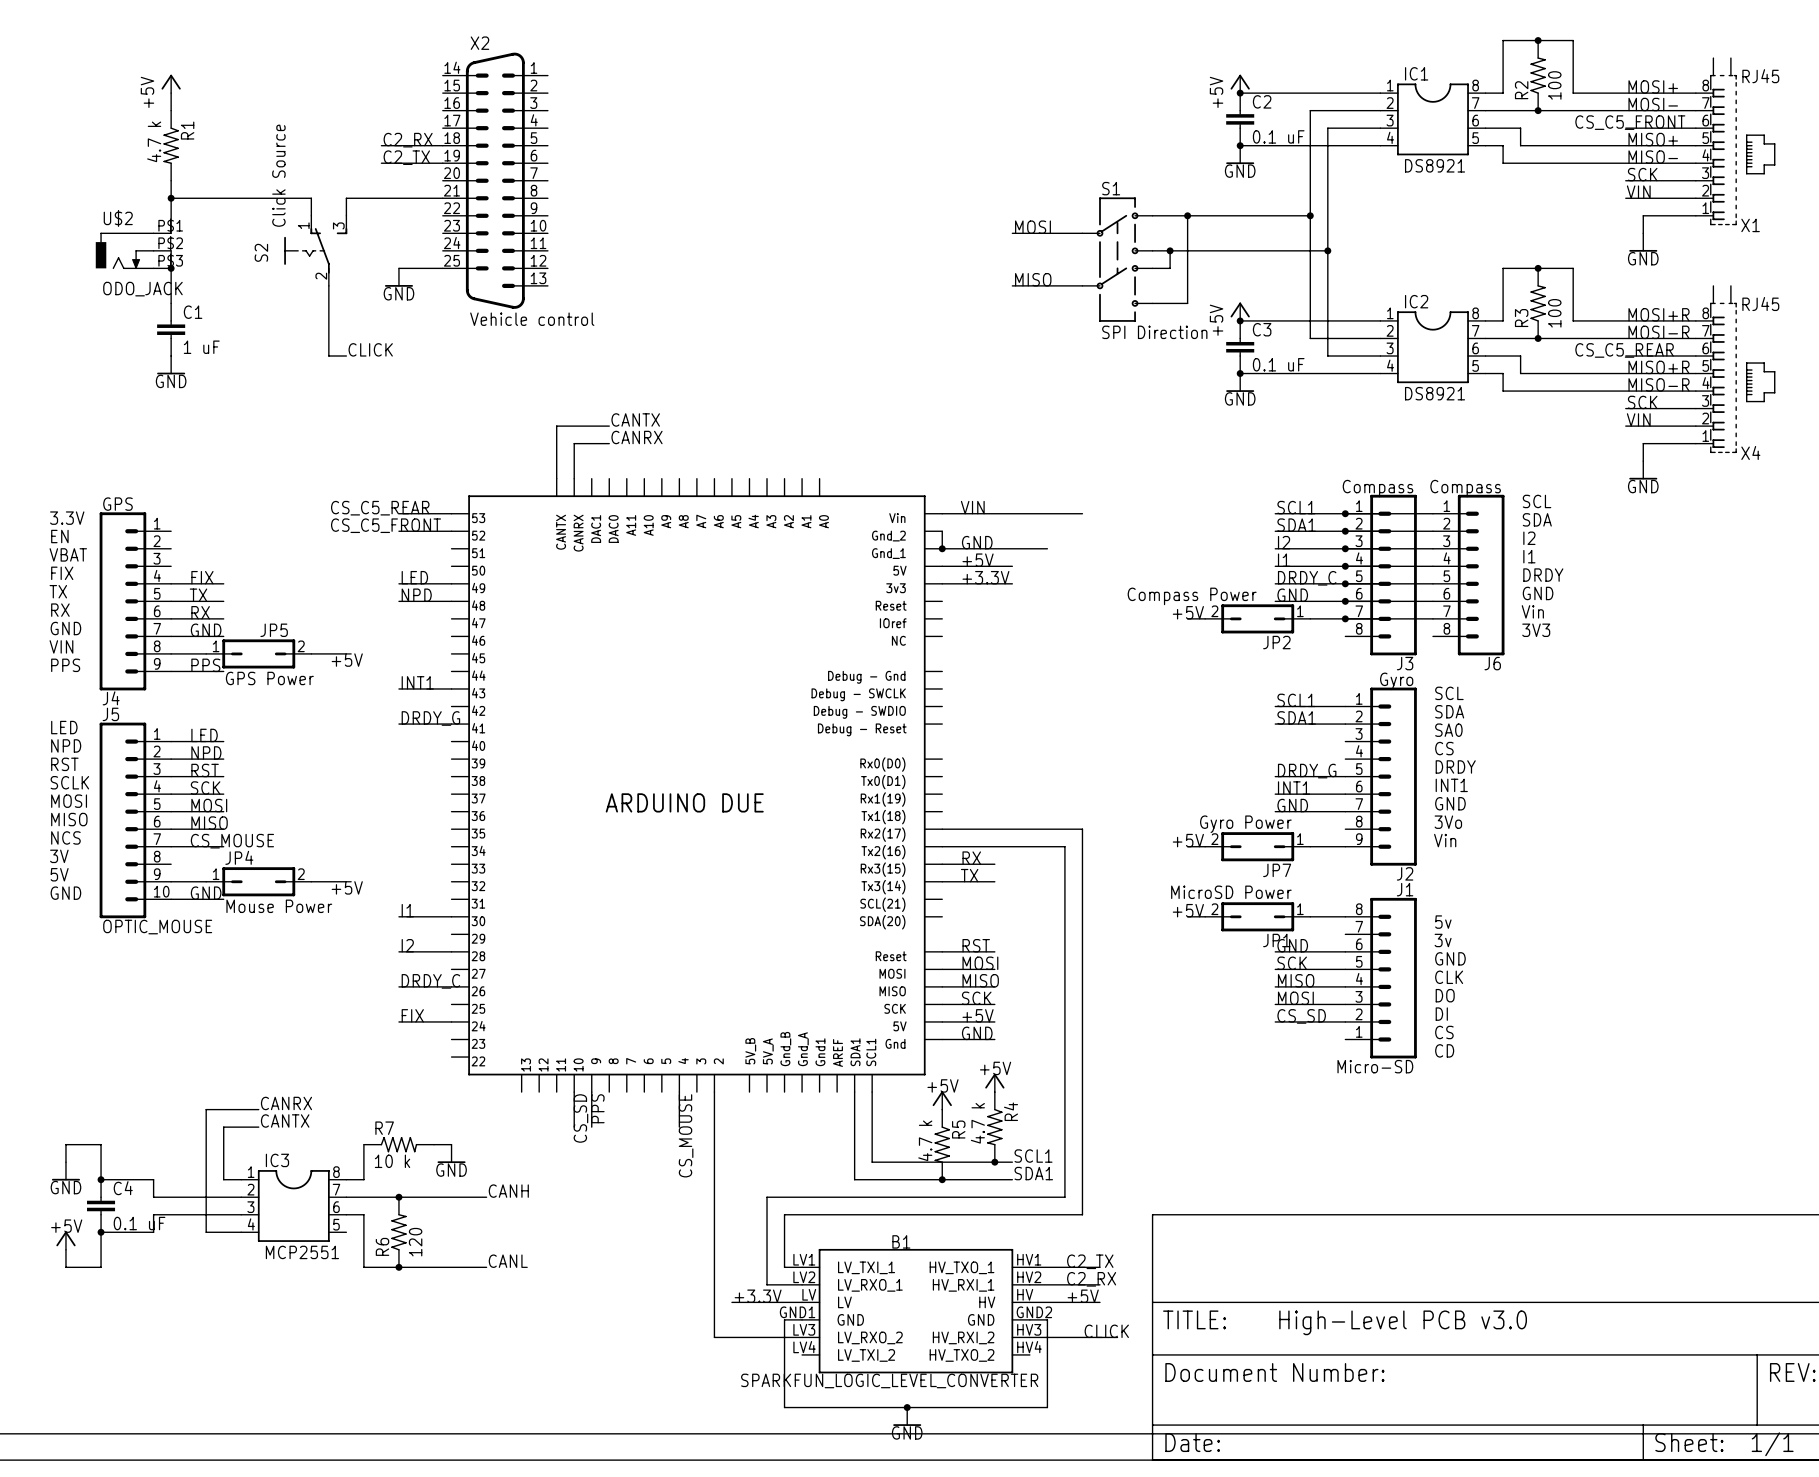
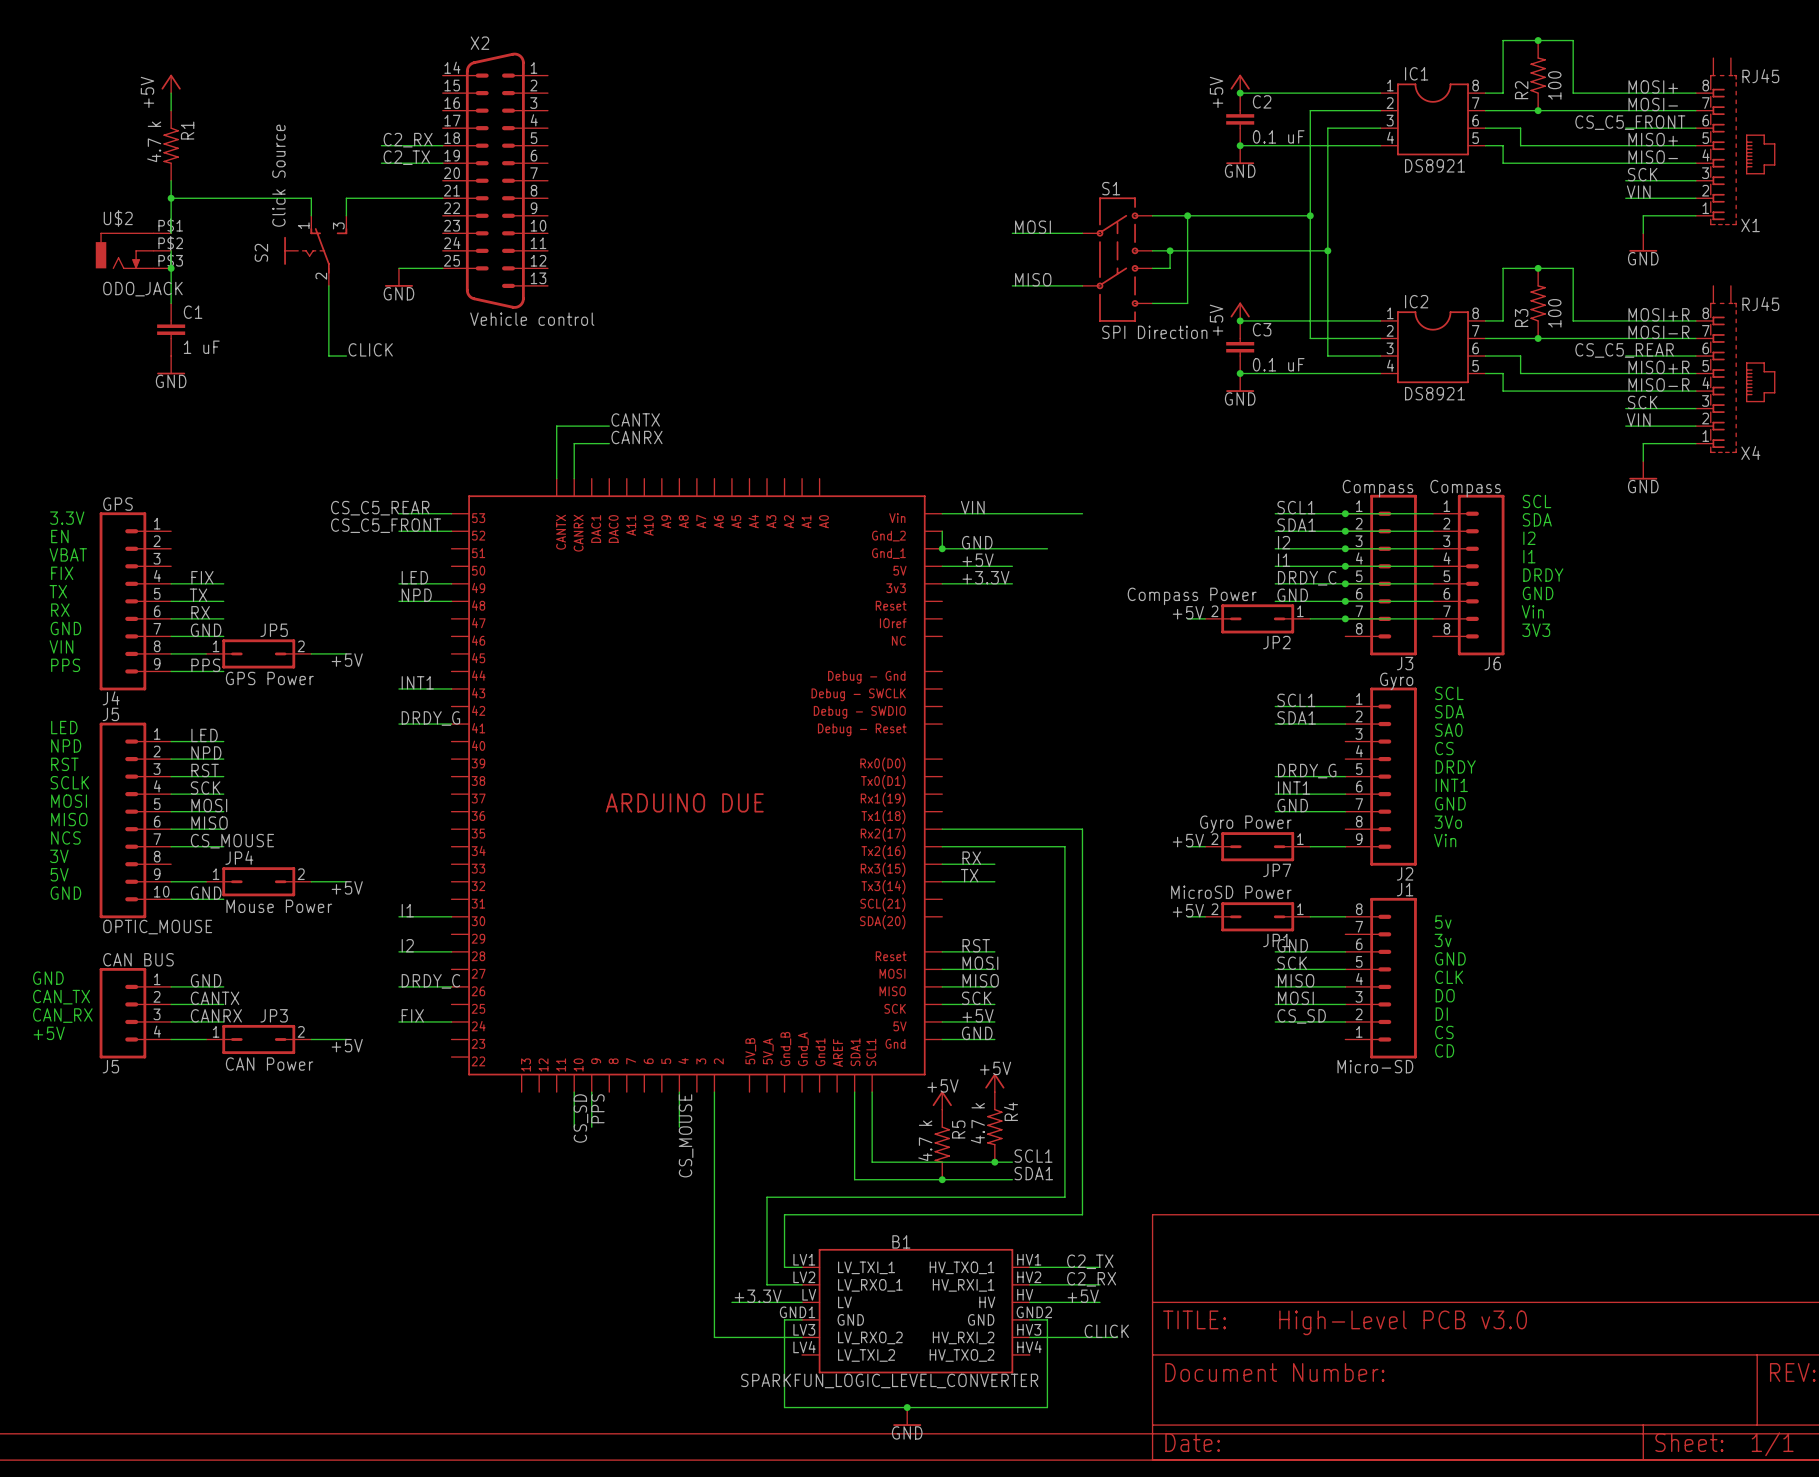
text: none -> GND (48, 978)
label: none -> GND (206, 980)
wire: none -> (171, 986) (223, 986)
text: none -> CAN_TX (61, 997)
wire: none -> (171, 1004) (223, 1004)
J5: none -> CAN BUS (135, 1013)
text: none -> CAN_RX (62, 1015)
wire: none -> (171, 1021) (223, 1021)
text: none -> +5V (49, 1033)
wire: none -> (171, 1039) (206, 1039)
JP3: none -> CAN Power (258, 1039)
wire: none -> (311, 1039) (346, 1039)
label: none -> +5V (347, 1045)
label position: CANRX (286, 1103) -> CANRX (216, 1015)
wire: (258, 1109) (206, 1109) (206, 1232) (241, 1232) -> none
label position: CANTX (285, 1120) -> CANTX (215, 998)
wire: (258, 1127) (223, 1127) (223, 1179) (241, 1179) -> none
wire: (363, 1144) (363, 1179) (346, 1179) -> none
R7: 10 k (398, 1144) -> none
wire: (434, 1144) (451, 1144) -> none
power symbol: GND (451, 1153) -> none
wire: (65, 1162) (65, 1144) (101, 1144) (101, 1179) (153, 1179) (153, 1197) (241, 1197) -> none
power symbol: GND (65, 1171) -> none
junction: (101, 1179) -> none
text: CANH (508, 1191) -> none
wire: (346, 1197) (486, 1197) -> none
junction: (398, 1197) -> none
C4: 0.1 uF (101, 1205) -> none
IC3: MCP2551 (293, 1205) -> none
wire: (241, 1214) (153, 1214) (153, 1232) (101, 1232) (101, 1267) (65, 1267) (65, 1249) -> none
wire: (346, 1214) (363, 1214) (363, 1267) (486, 1267) -> none
junction: (101, 1232) -> none
R6: 120 (398, 1232) -> none
power symbol: +5V (65, 1240) -> none
text: CANL (508, 1261) -> none
junction: (398, 1267) -> none

